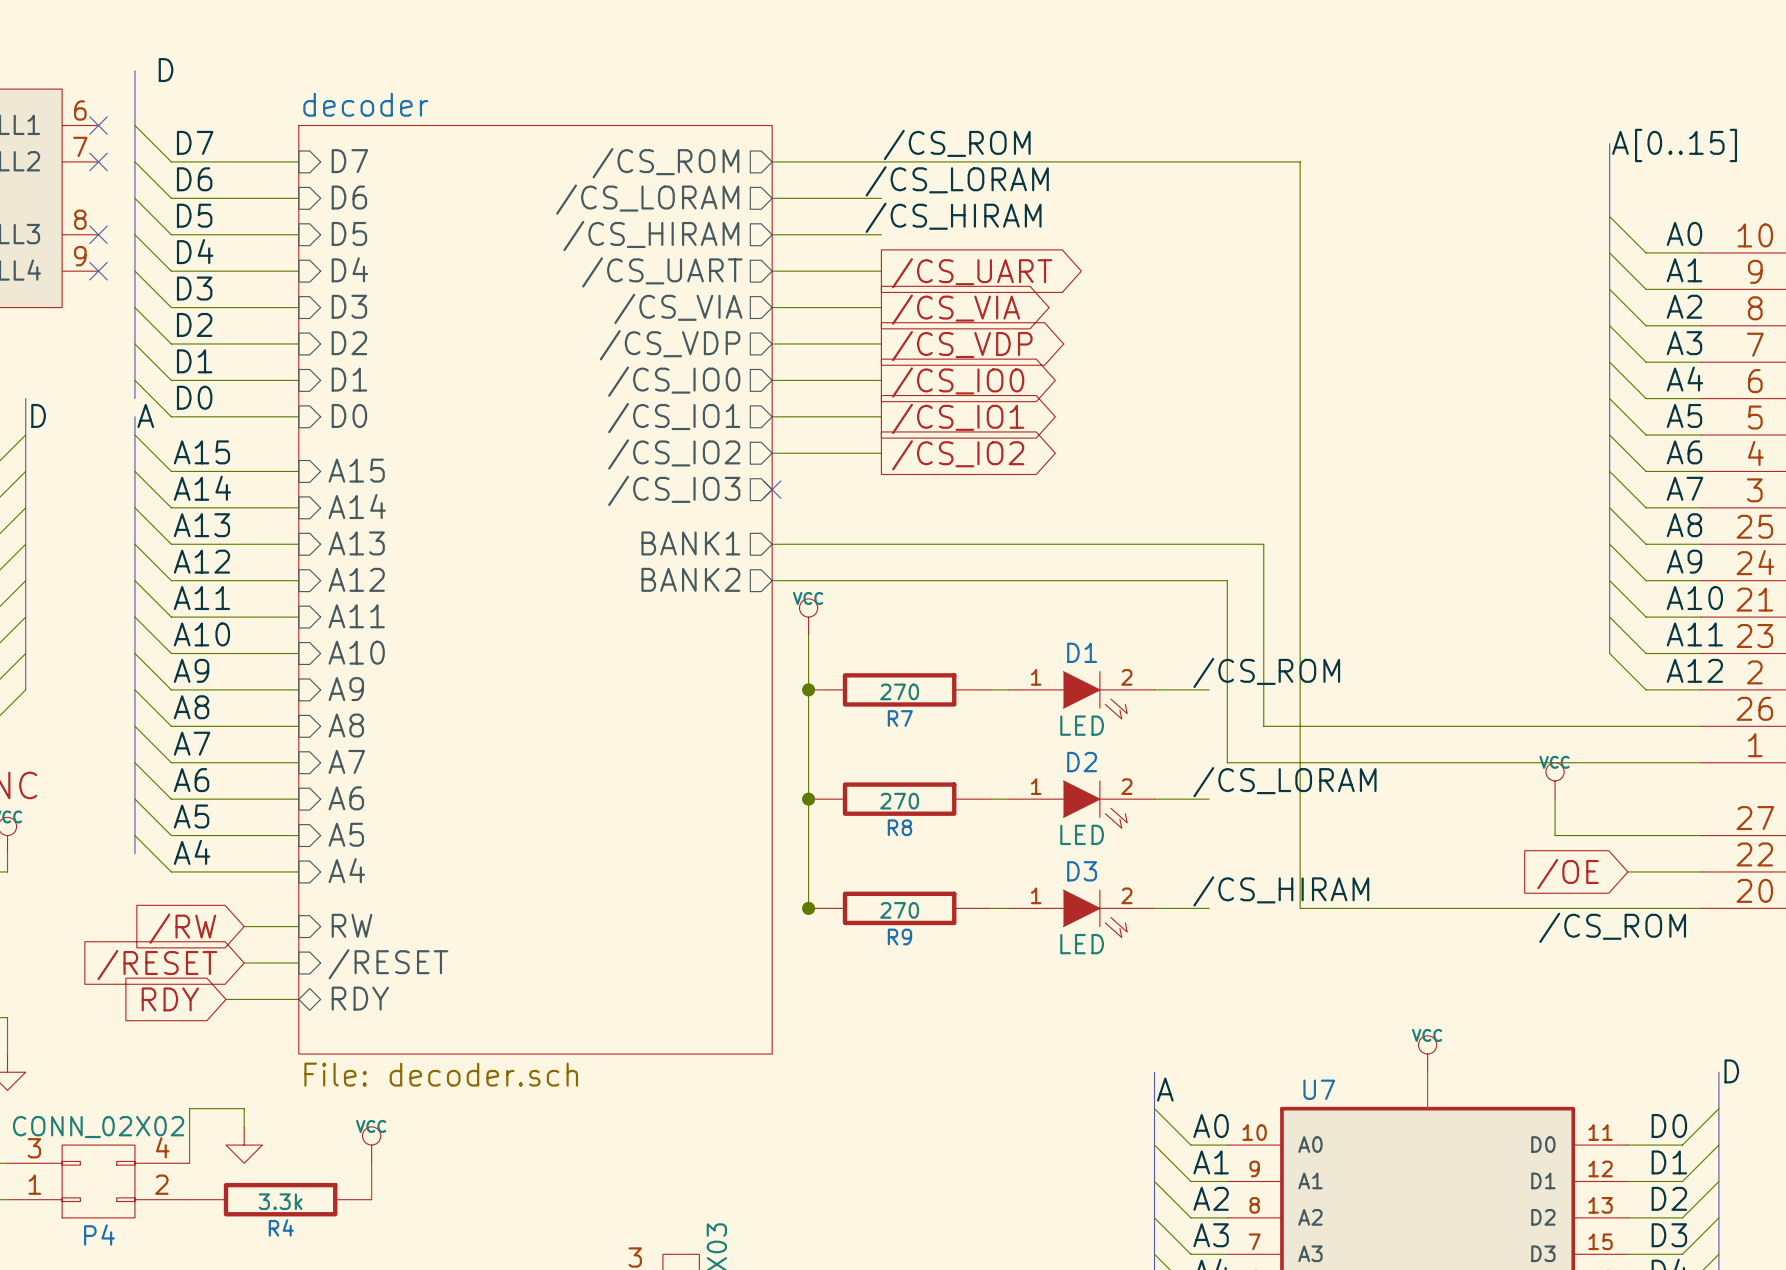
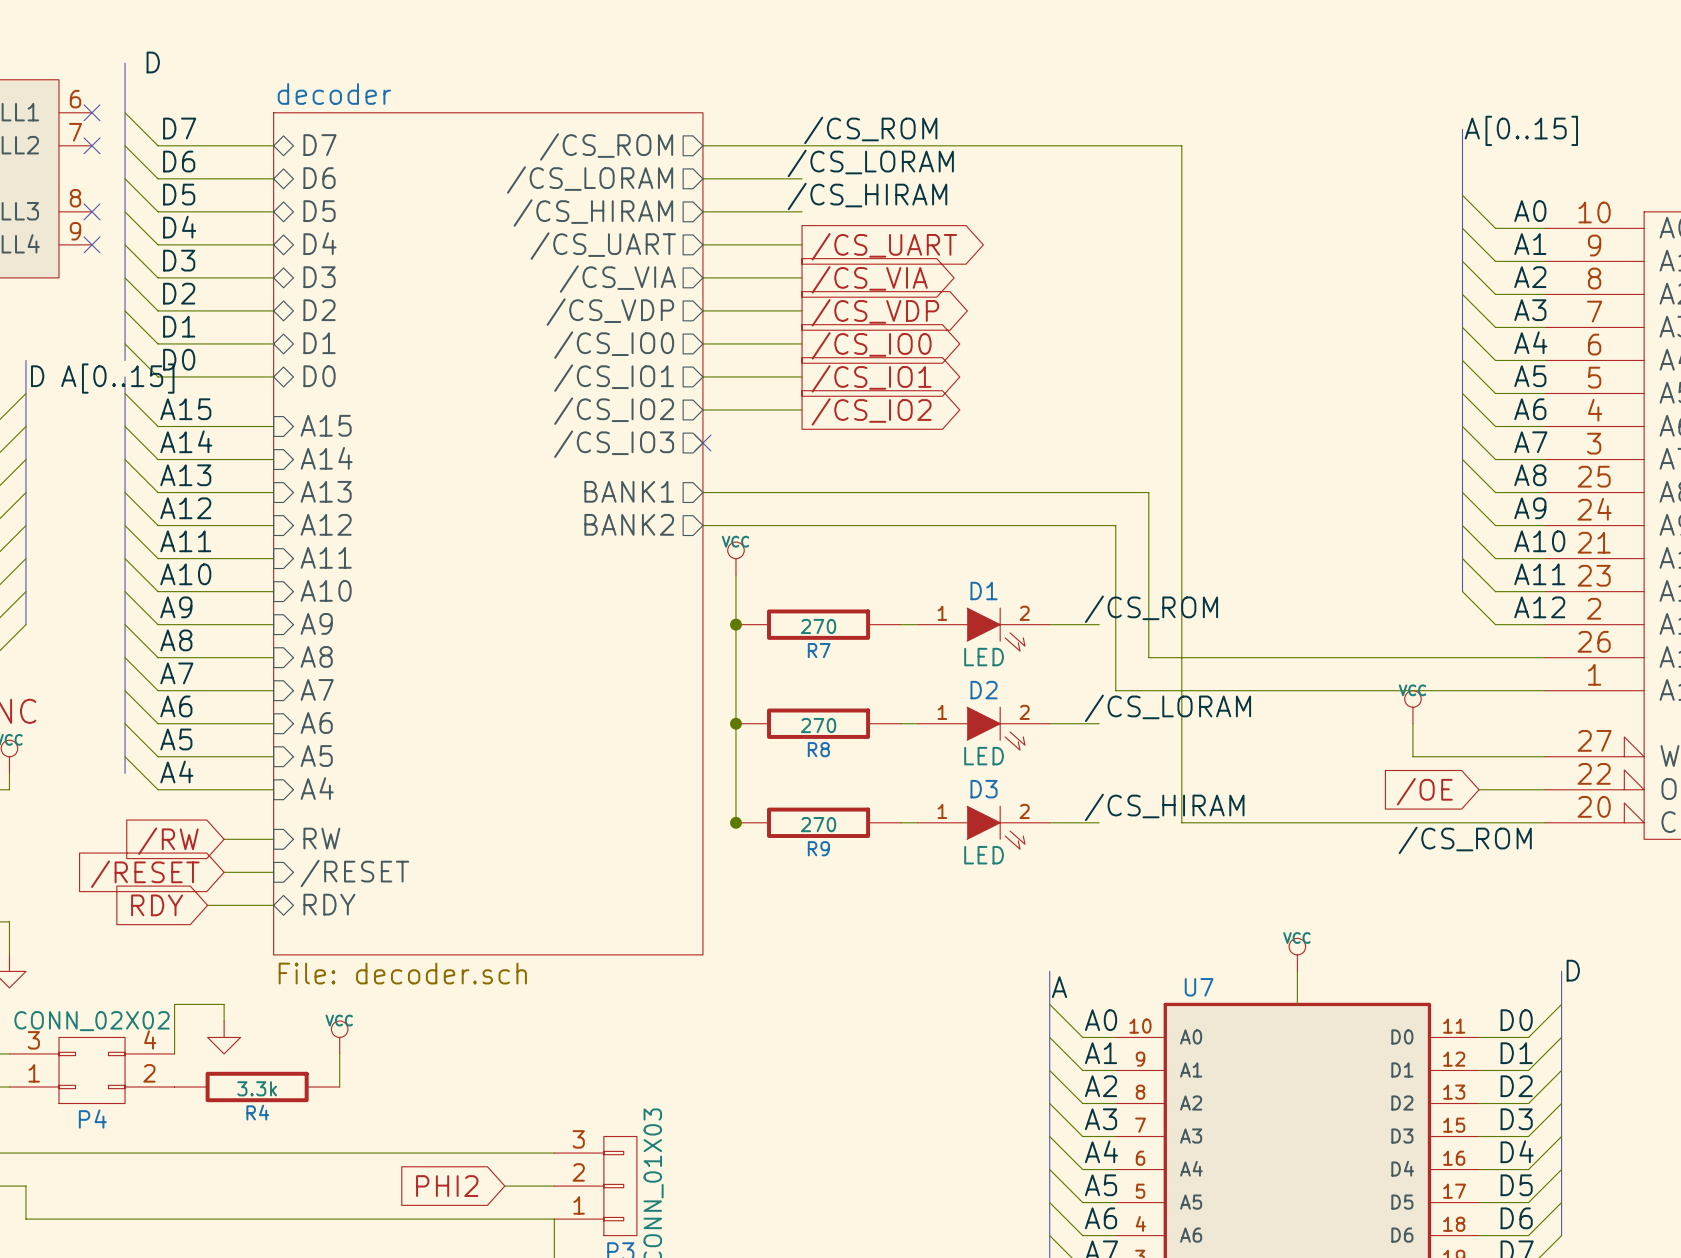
sheet pin shape: input (349, 161) -> bidirectional (320, 145)
sheet pin shape: input (349, 197) -> bidirectional (319, 178)
sheet pin shape: input (349, 233) -> bidirectional (319, 211)
sheet pin shape: input (349, 269) -> bidirectional (320, 243)
sheet pin shape: input (349, 306) -> bidirectional (319, 277)
sheet pin shape: input (349, 343) -> bidirectional (319, 310)
sheet pin shape: input (349, 379) -> bidirectional (319, 343)
label: A (145, 415) -> none
sheet pin shape: input (349, 416) -> bidirectional (319, 376)
label: none -> A[0..15] (117, 378)

